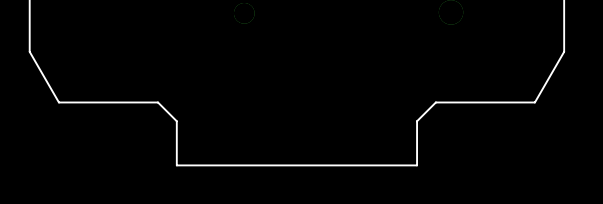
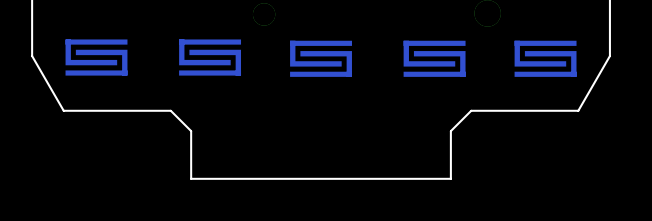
part: none -> (96, 57)
part: none -> (210, 57)
part: none -> (321, 58)
part: none -> (434, 58)
part: none -> (545, 58)

